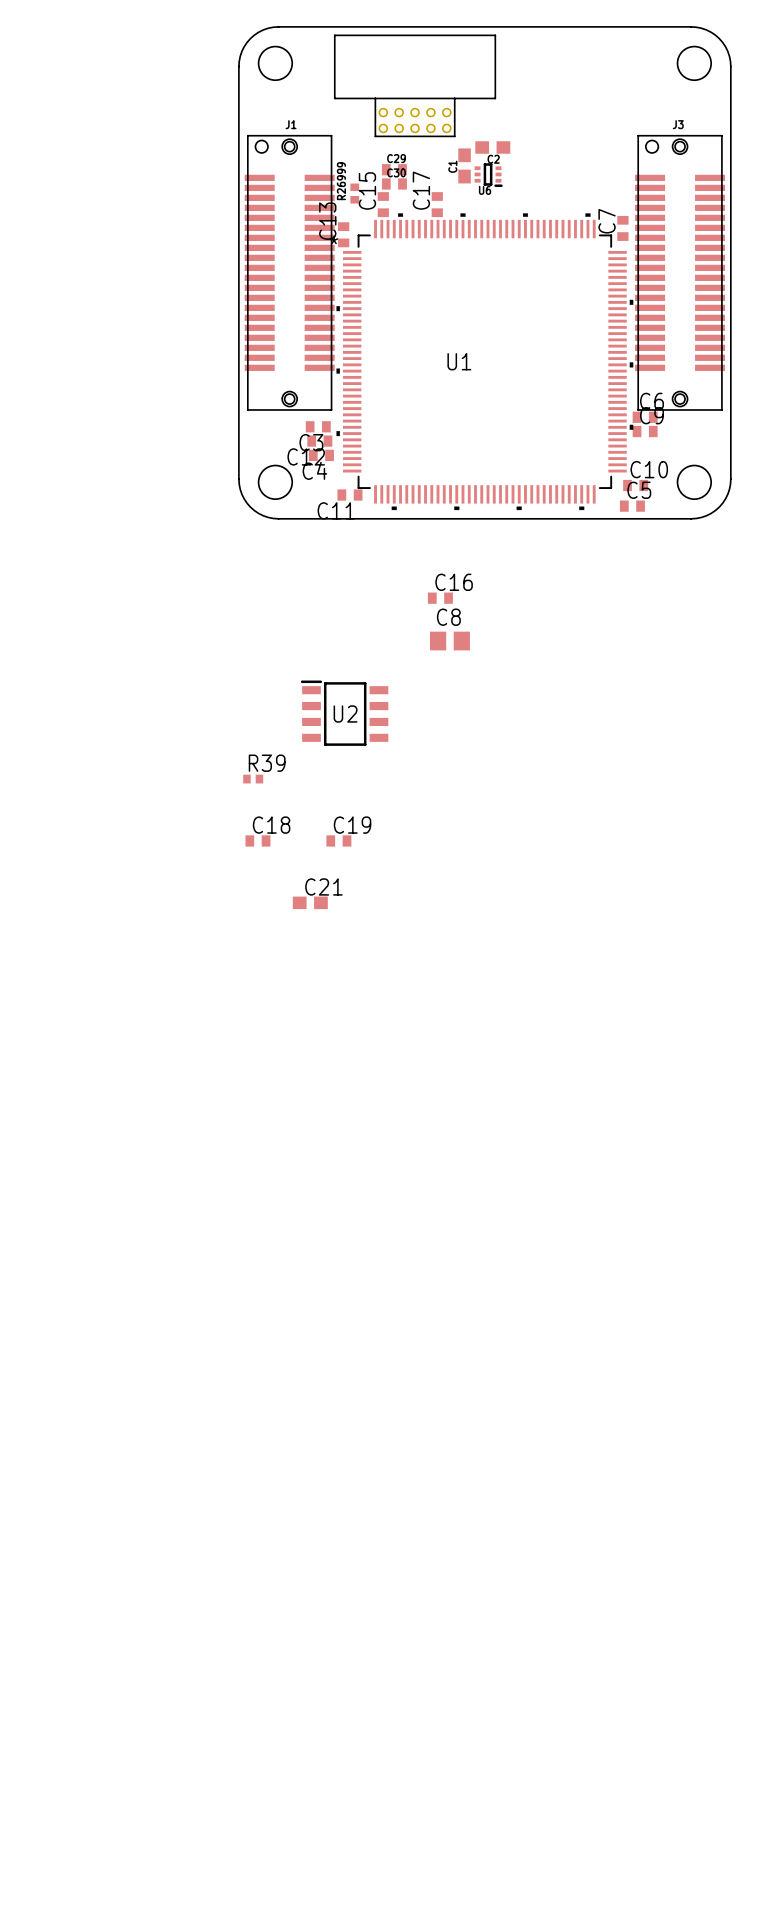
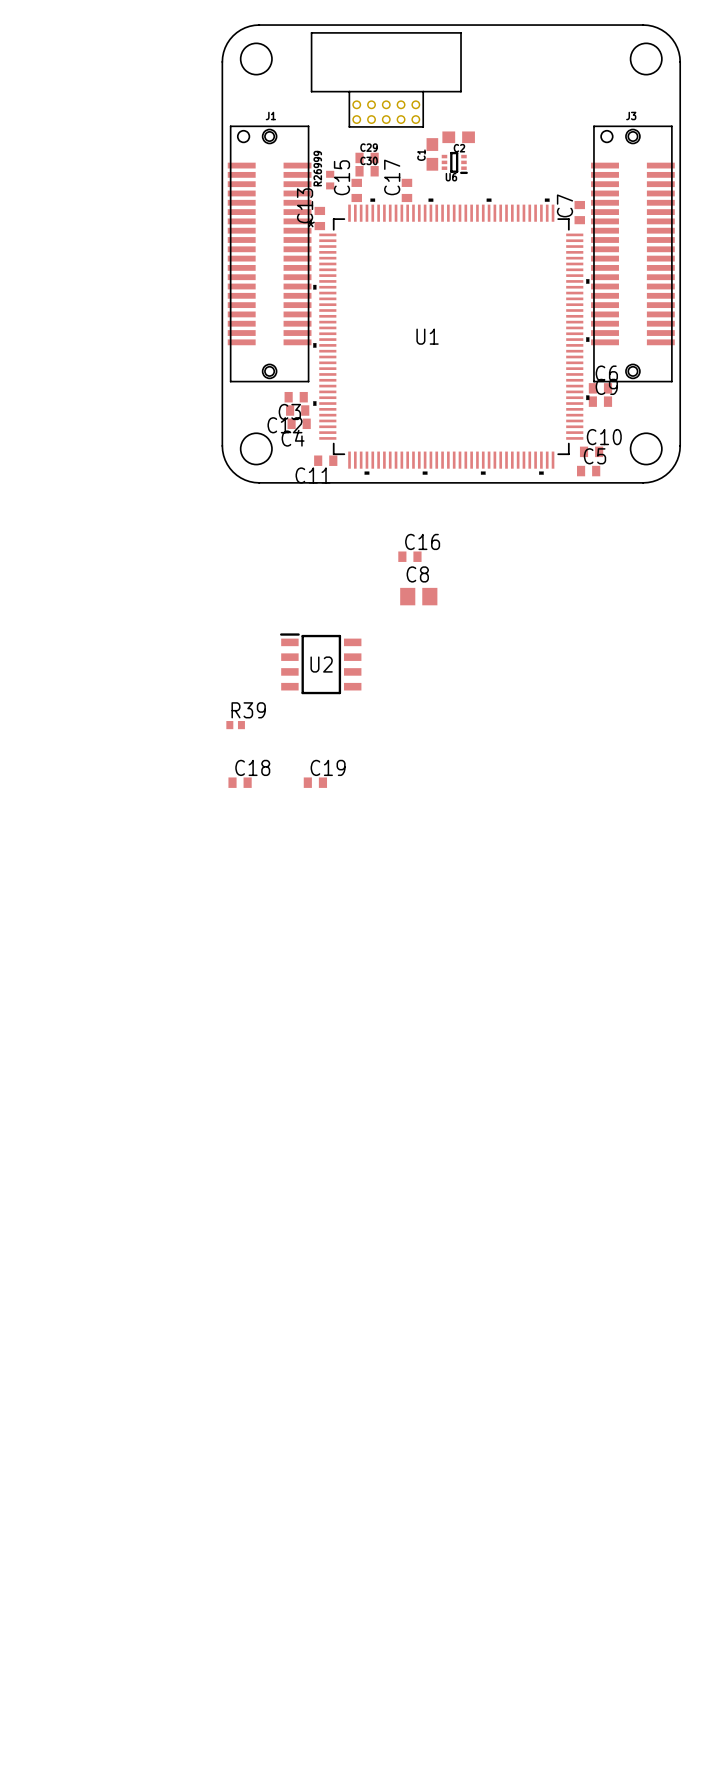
C21: (310, 902) -> none

